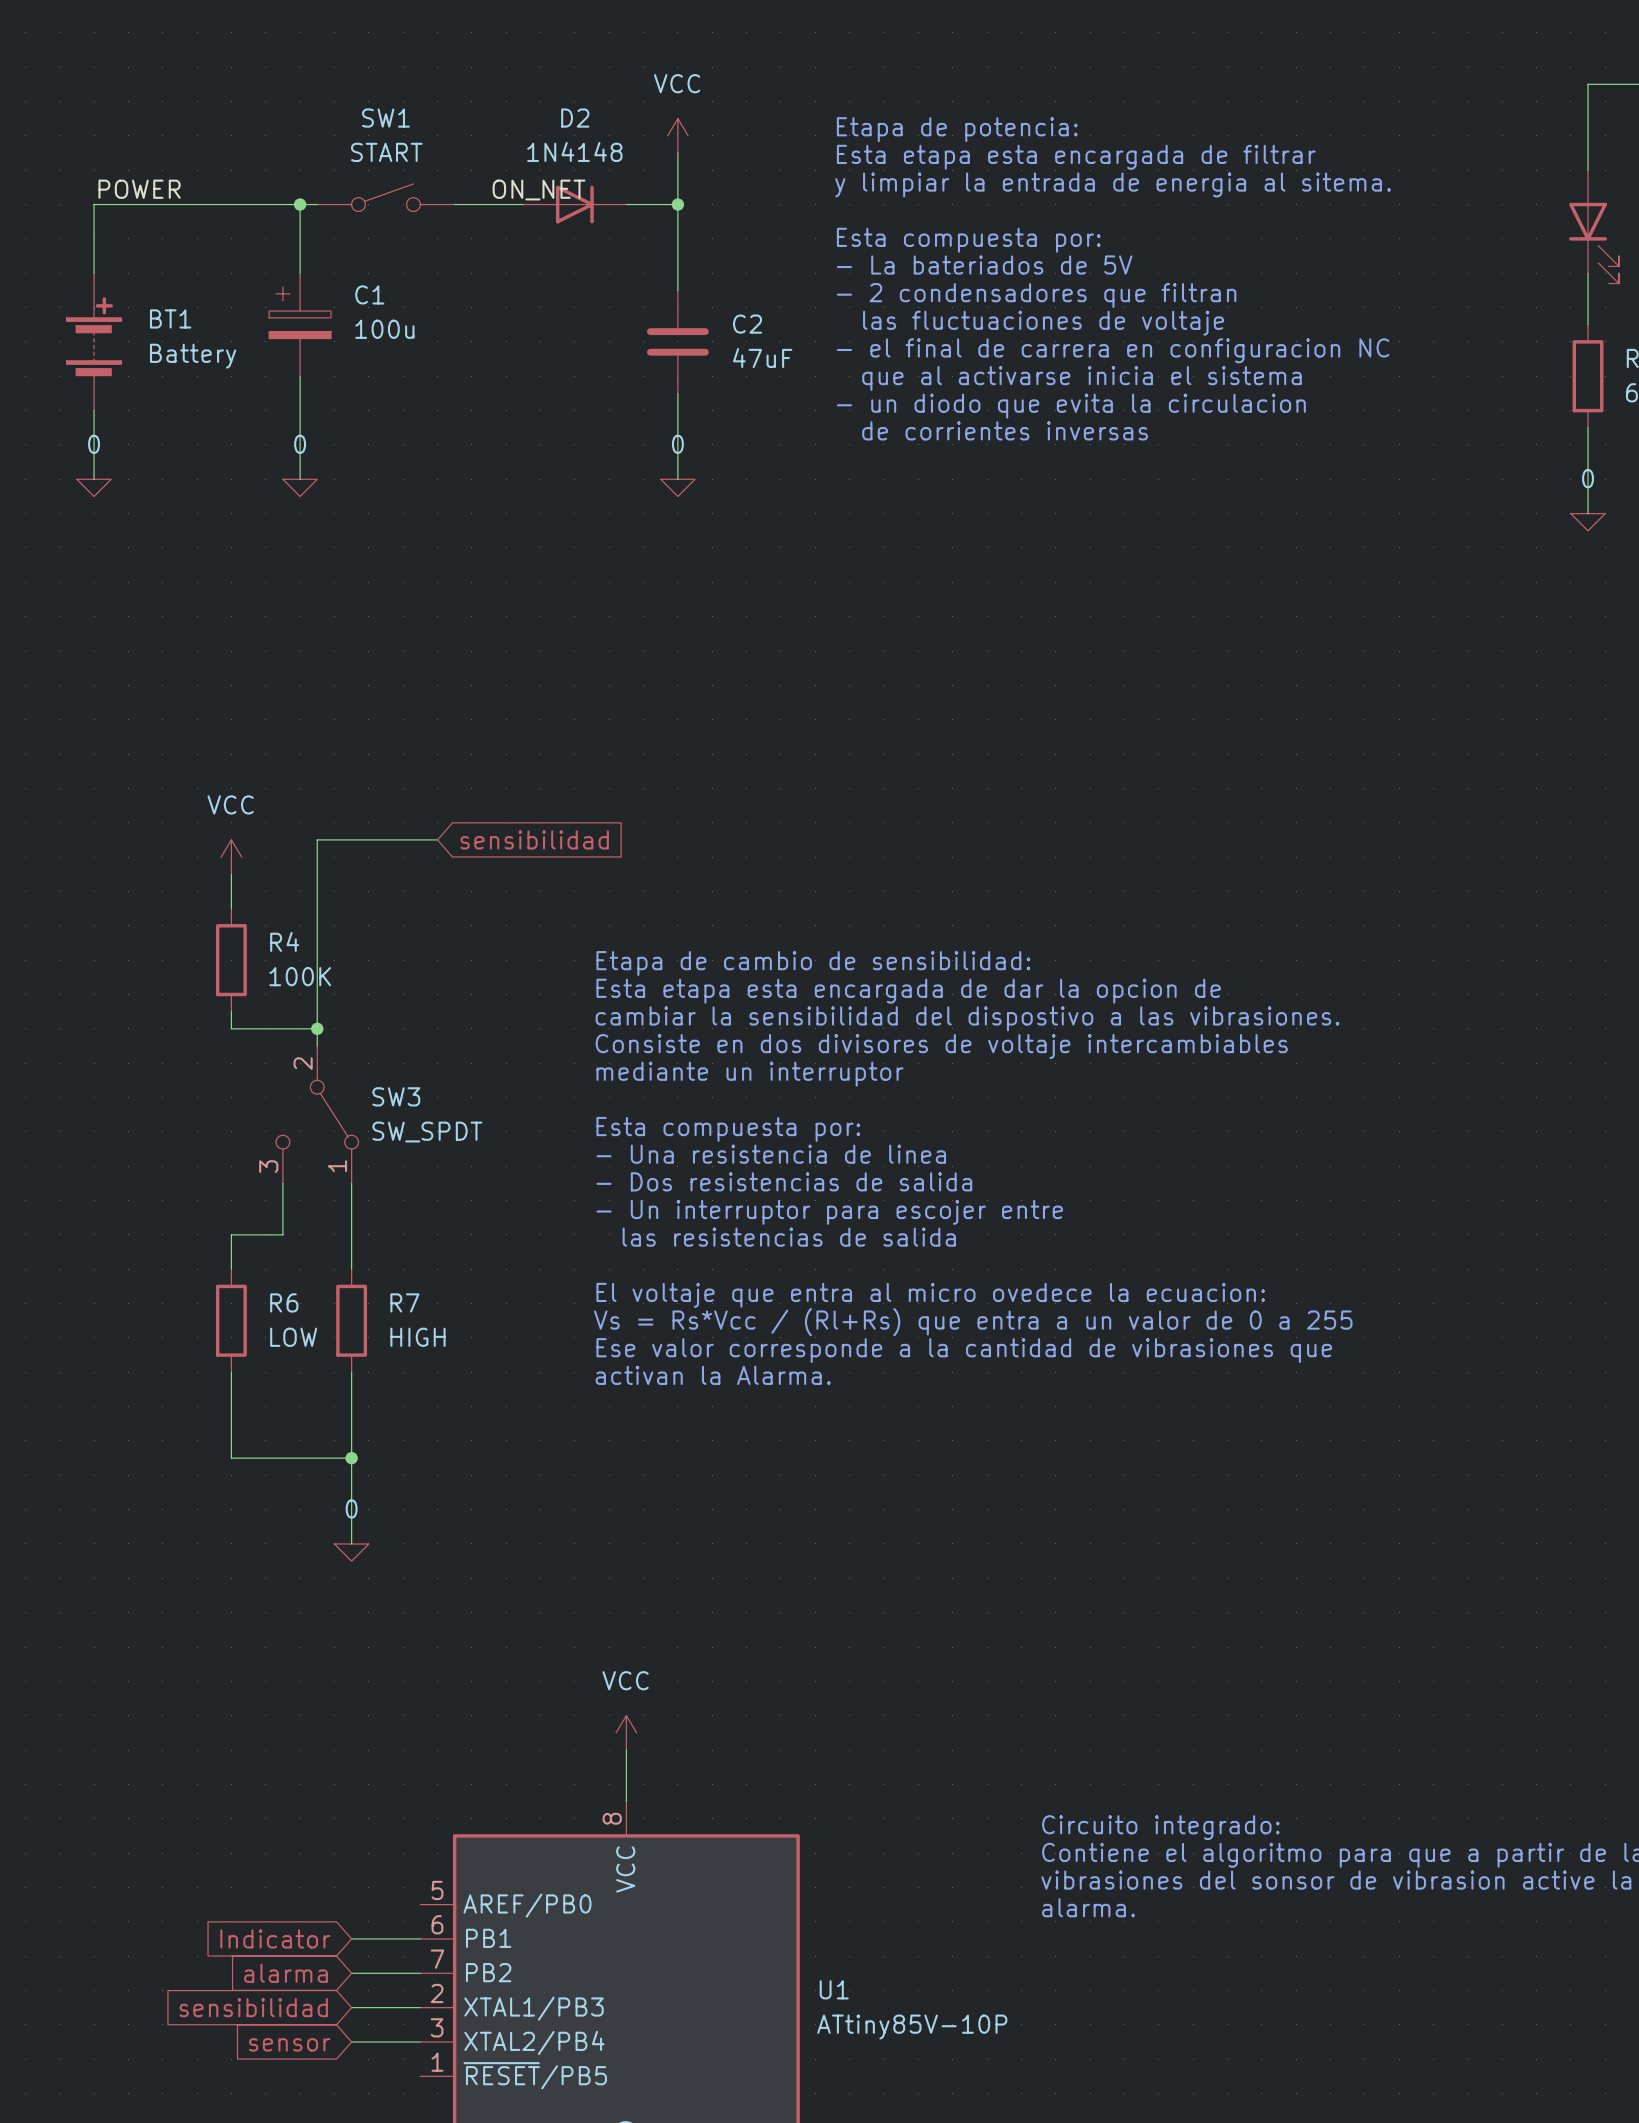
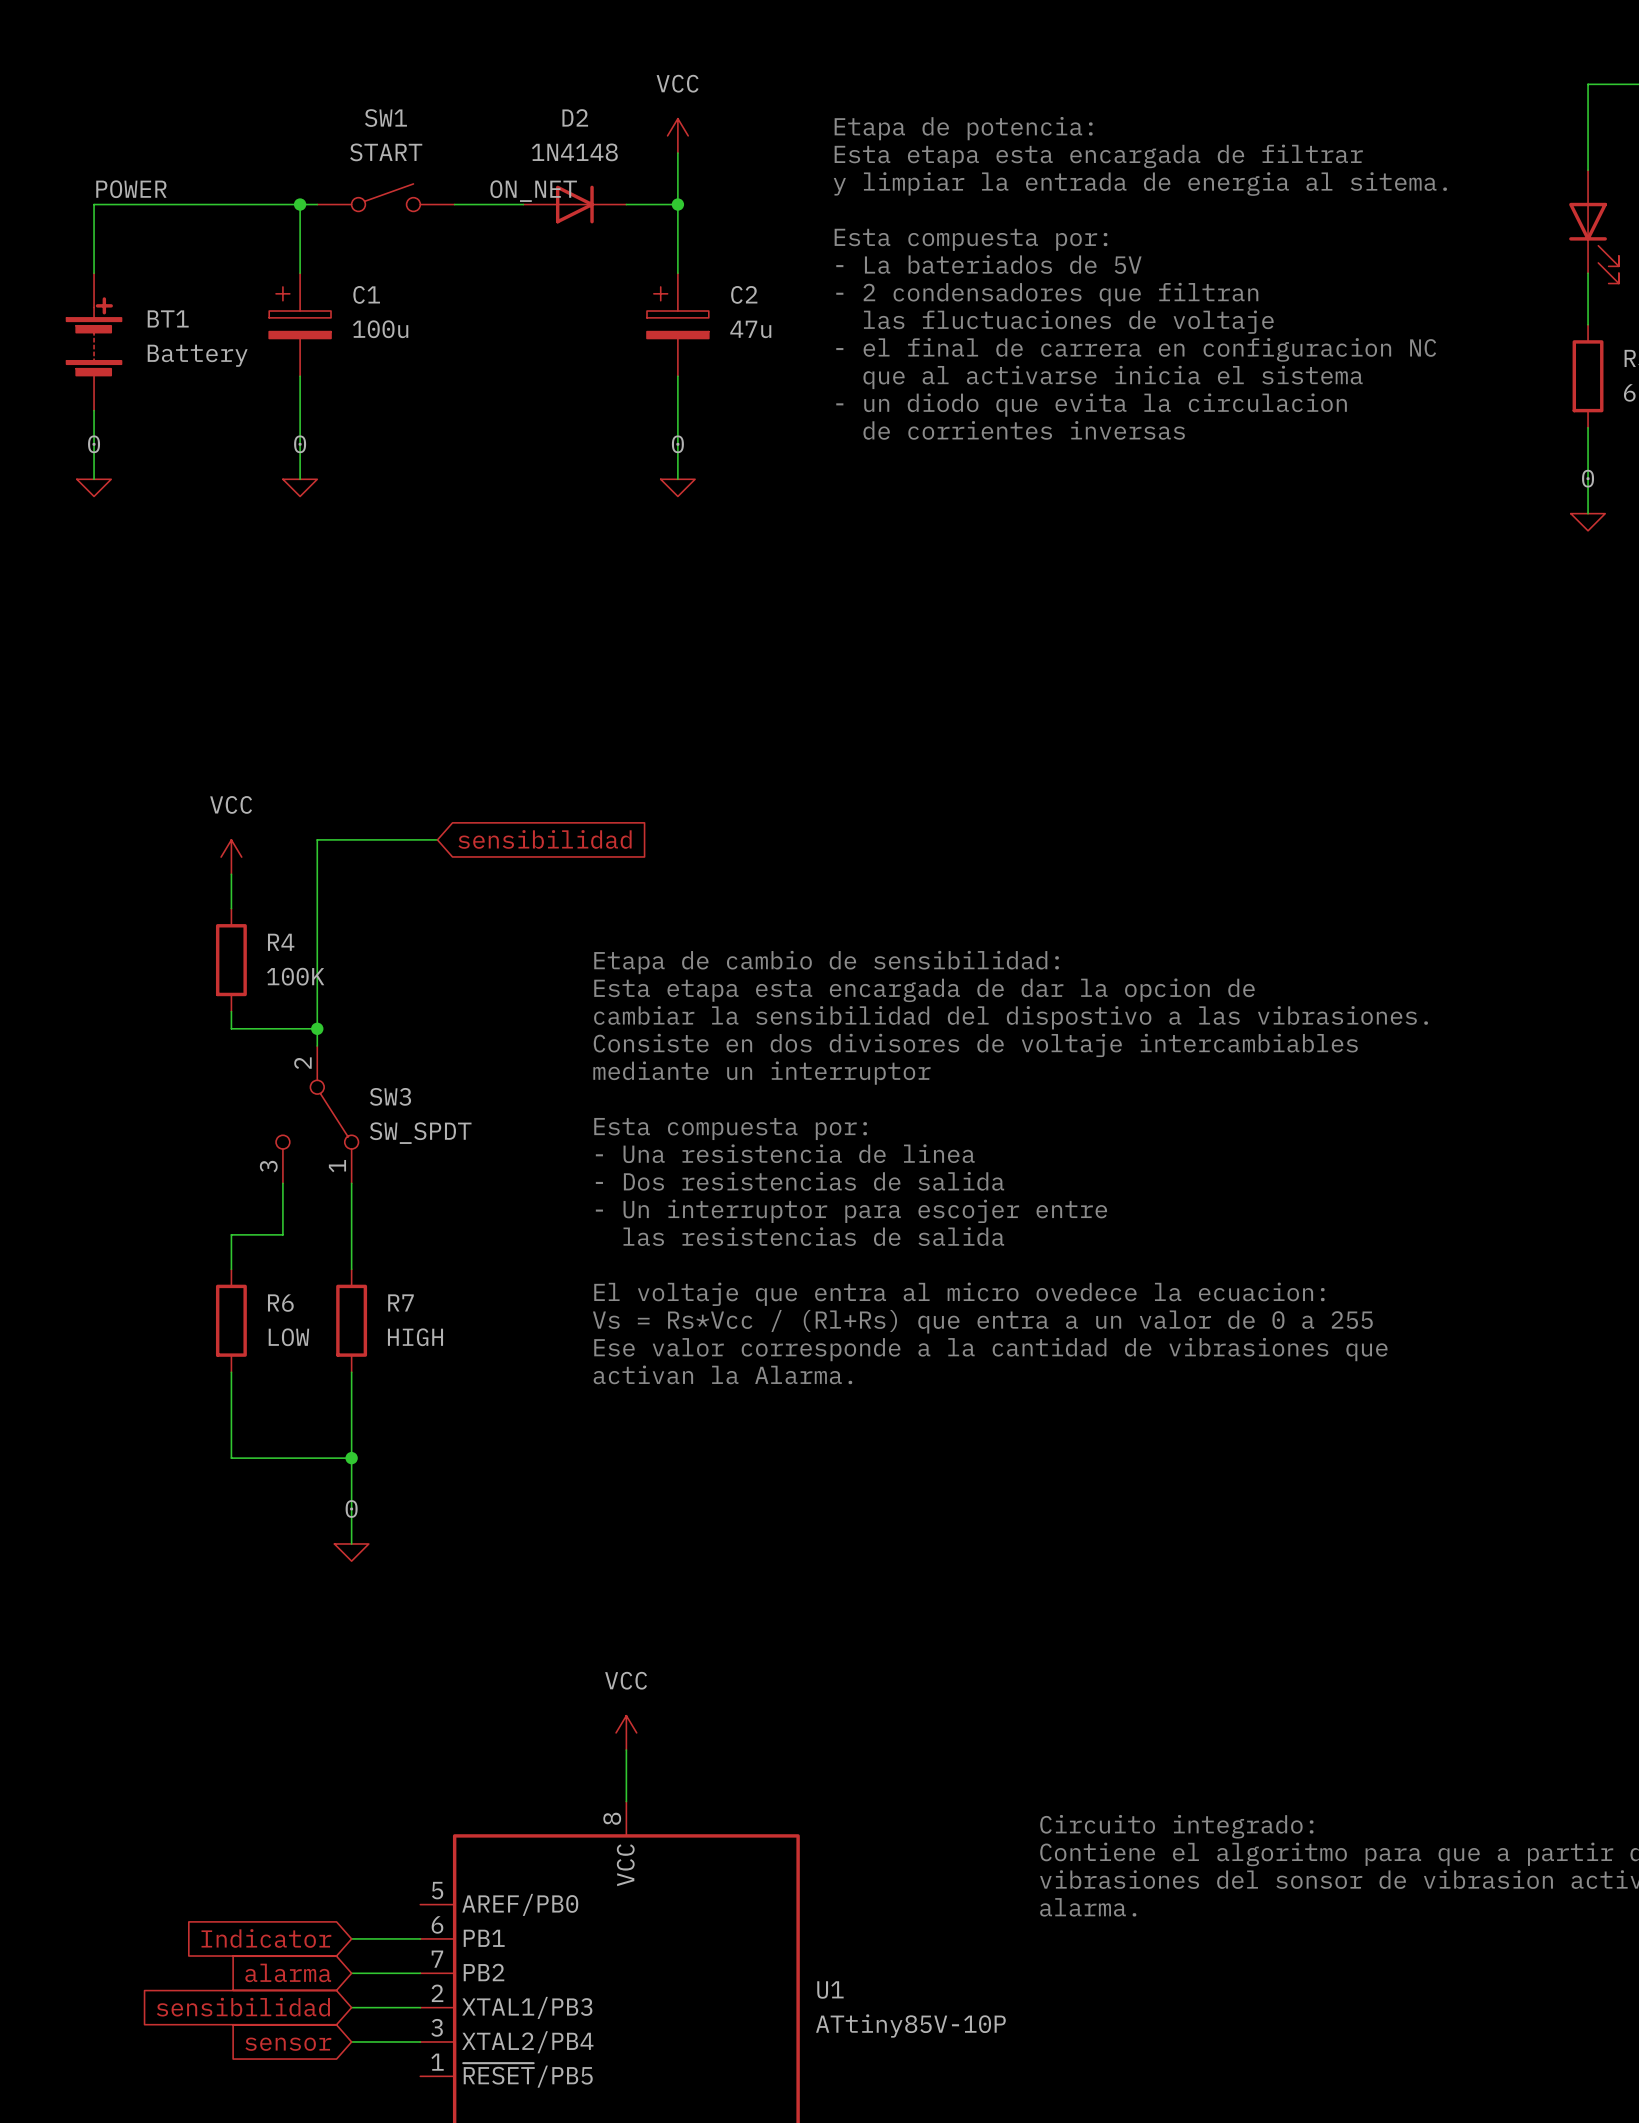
C2 symbol: [646, 290, 709, 394] -> [646, 273, 709, 377]
C2 value: 47uF (762, 358) -> 47u (750, 329)

